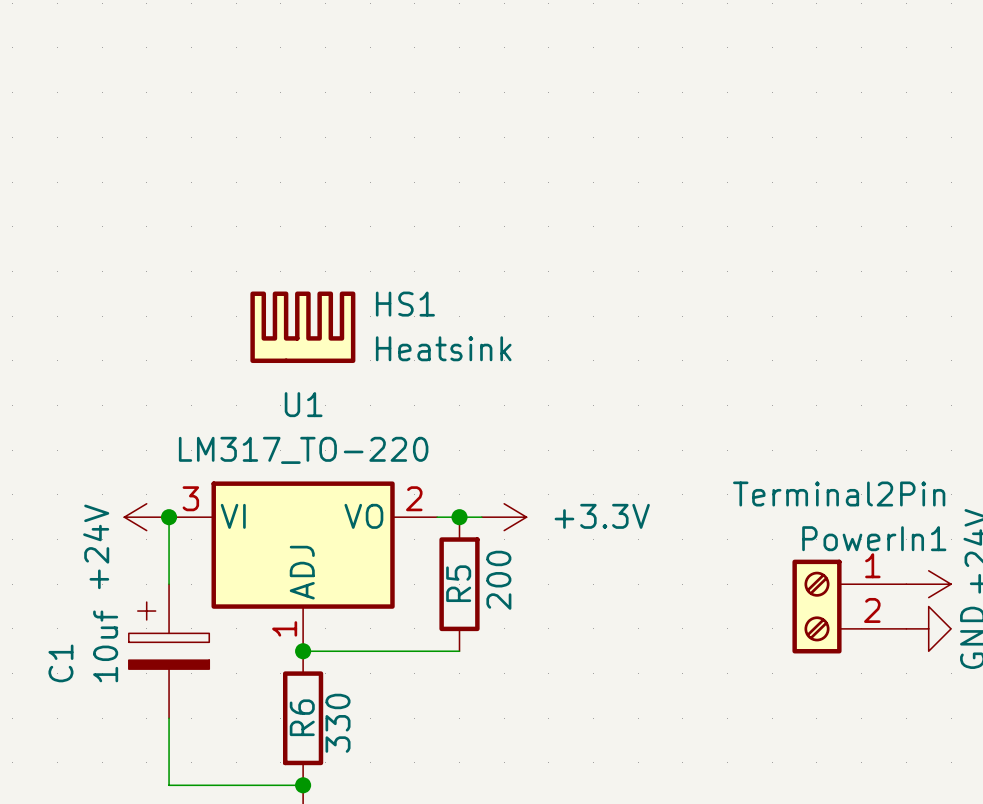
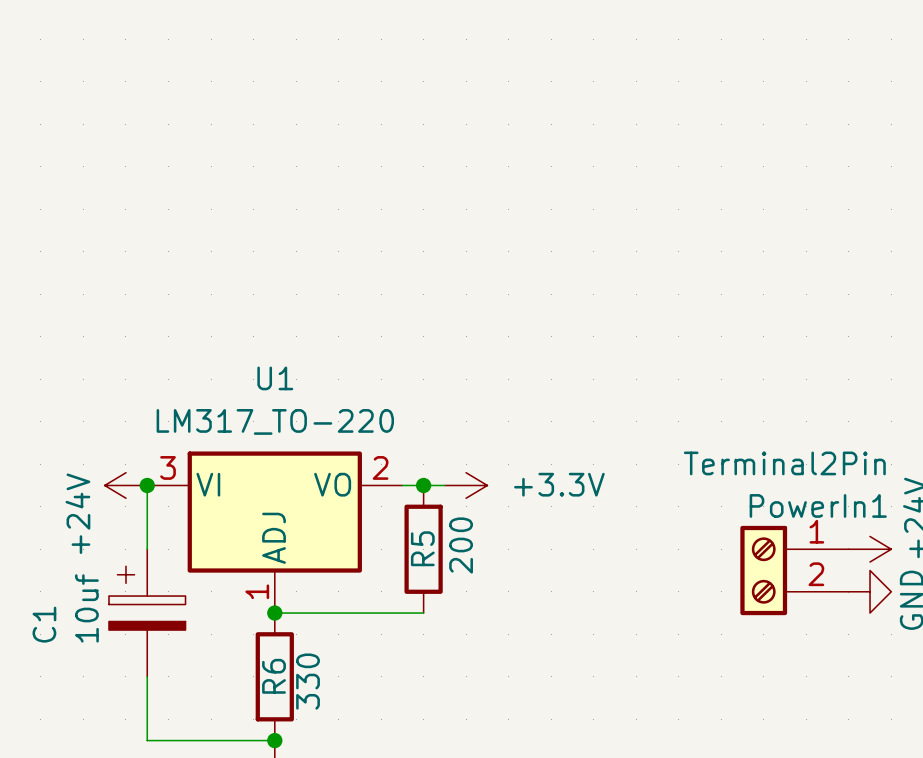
HS1: Heatsink (302, 327) -> none

